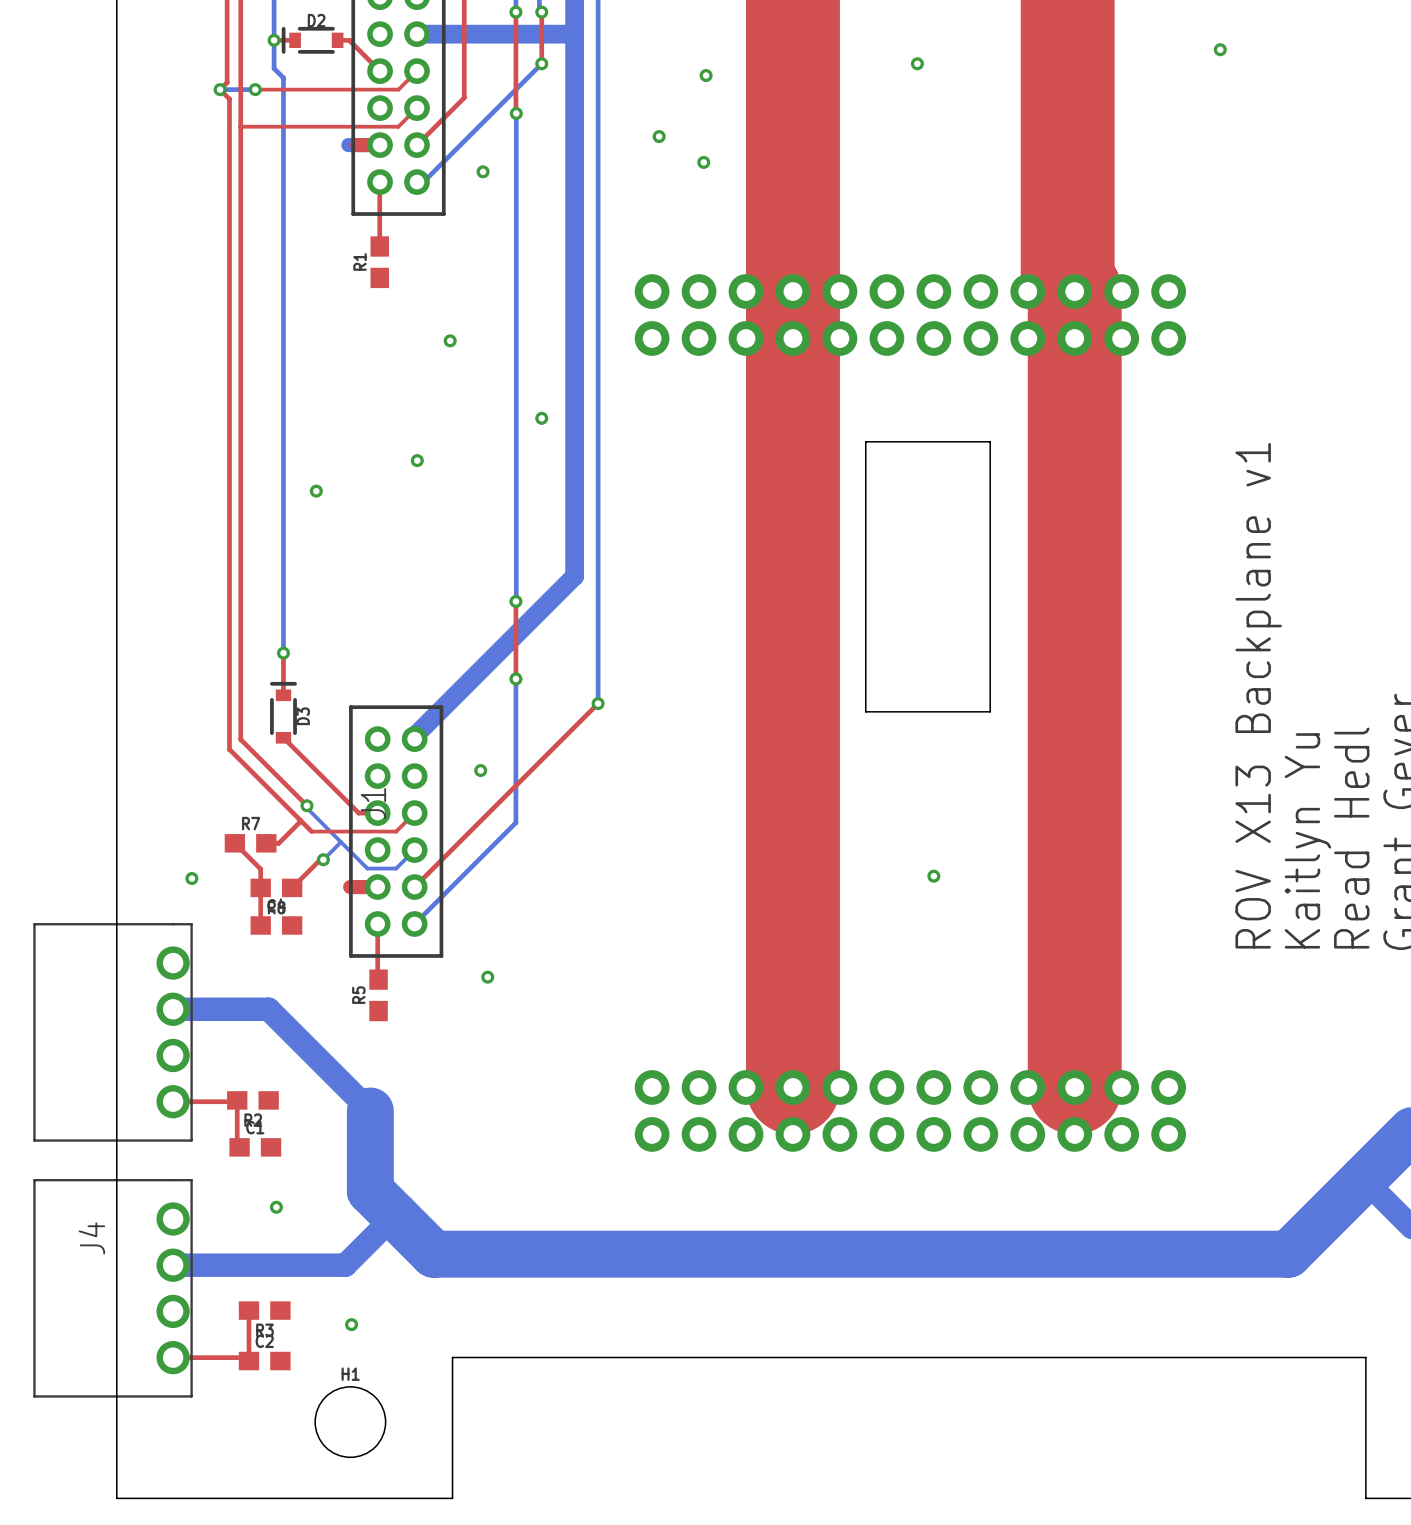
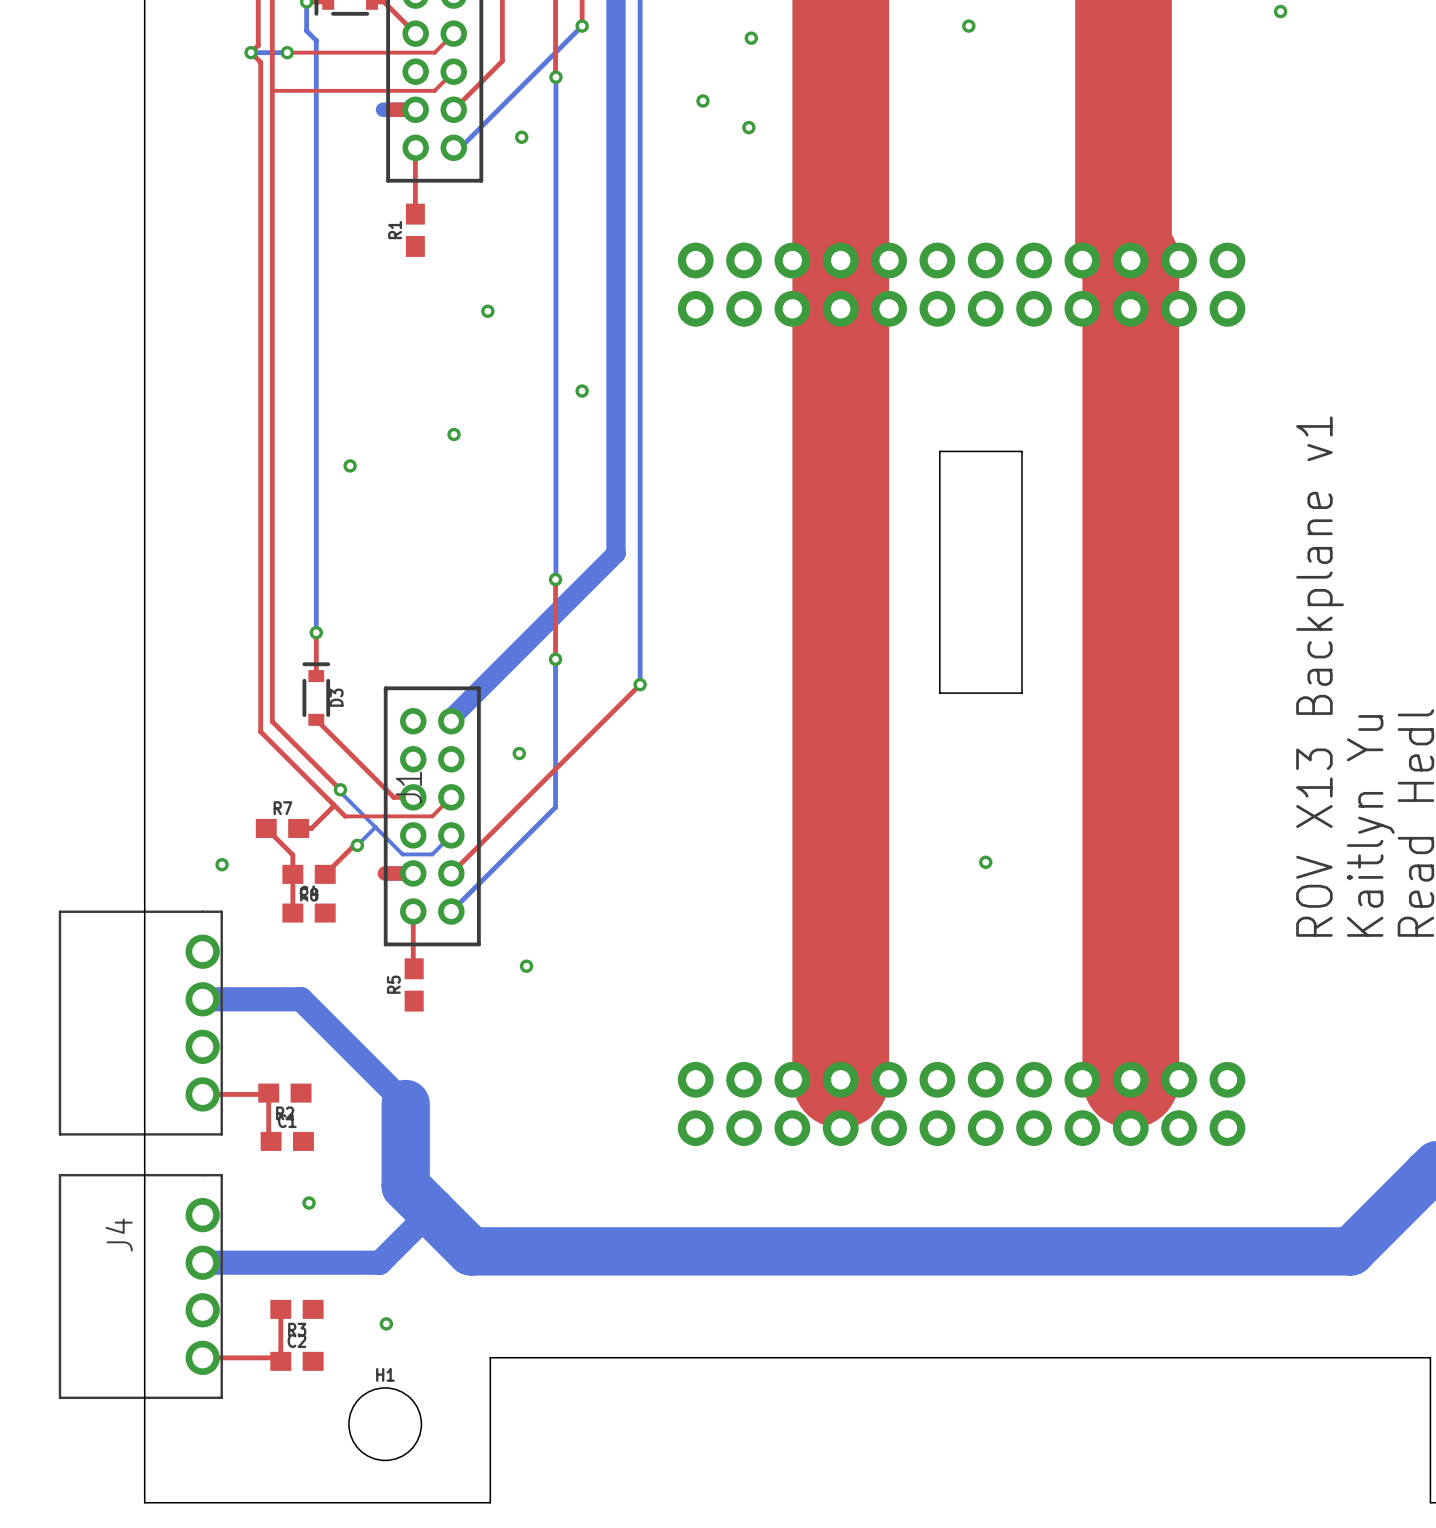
board edge: (889, 711) (865, 711) (865, 441) (990, 441) (990, 711) (969, 711) -> (939, 693) (939, 451) (1021, 451) (1021, 693)

